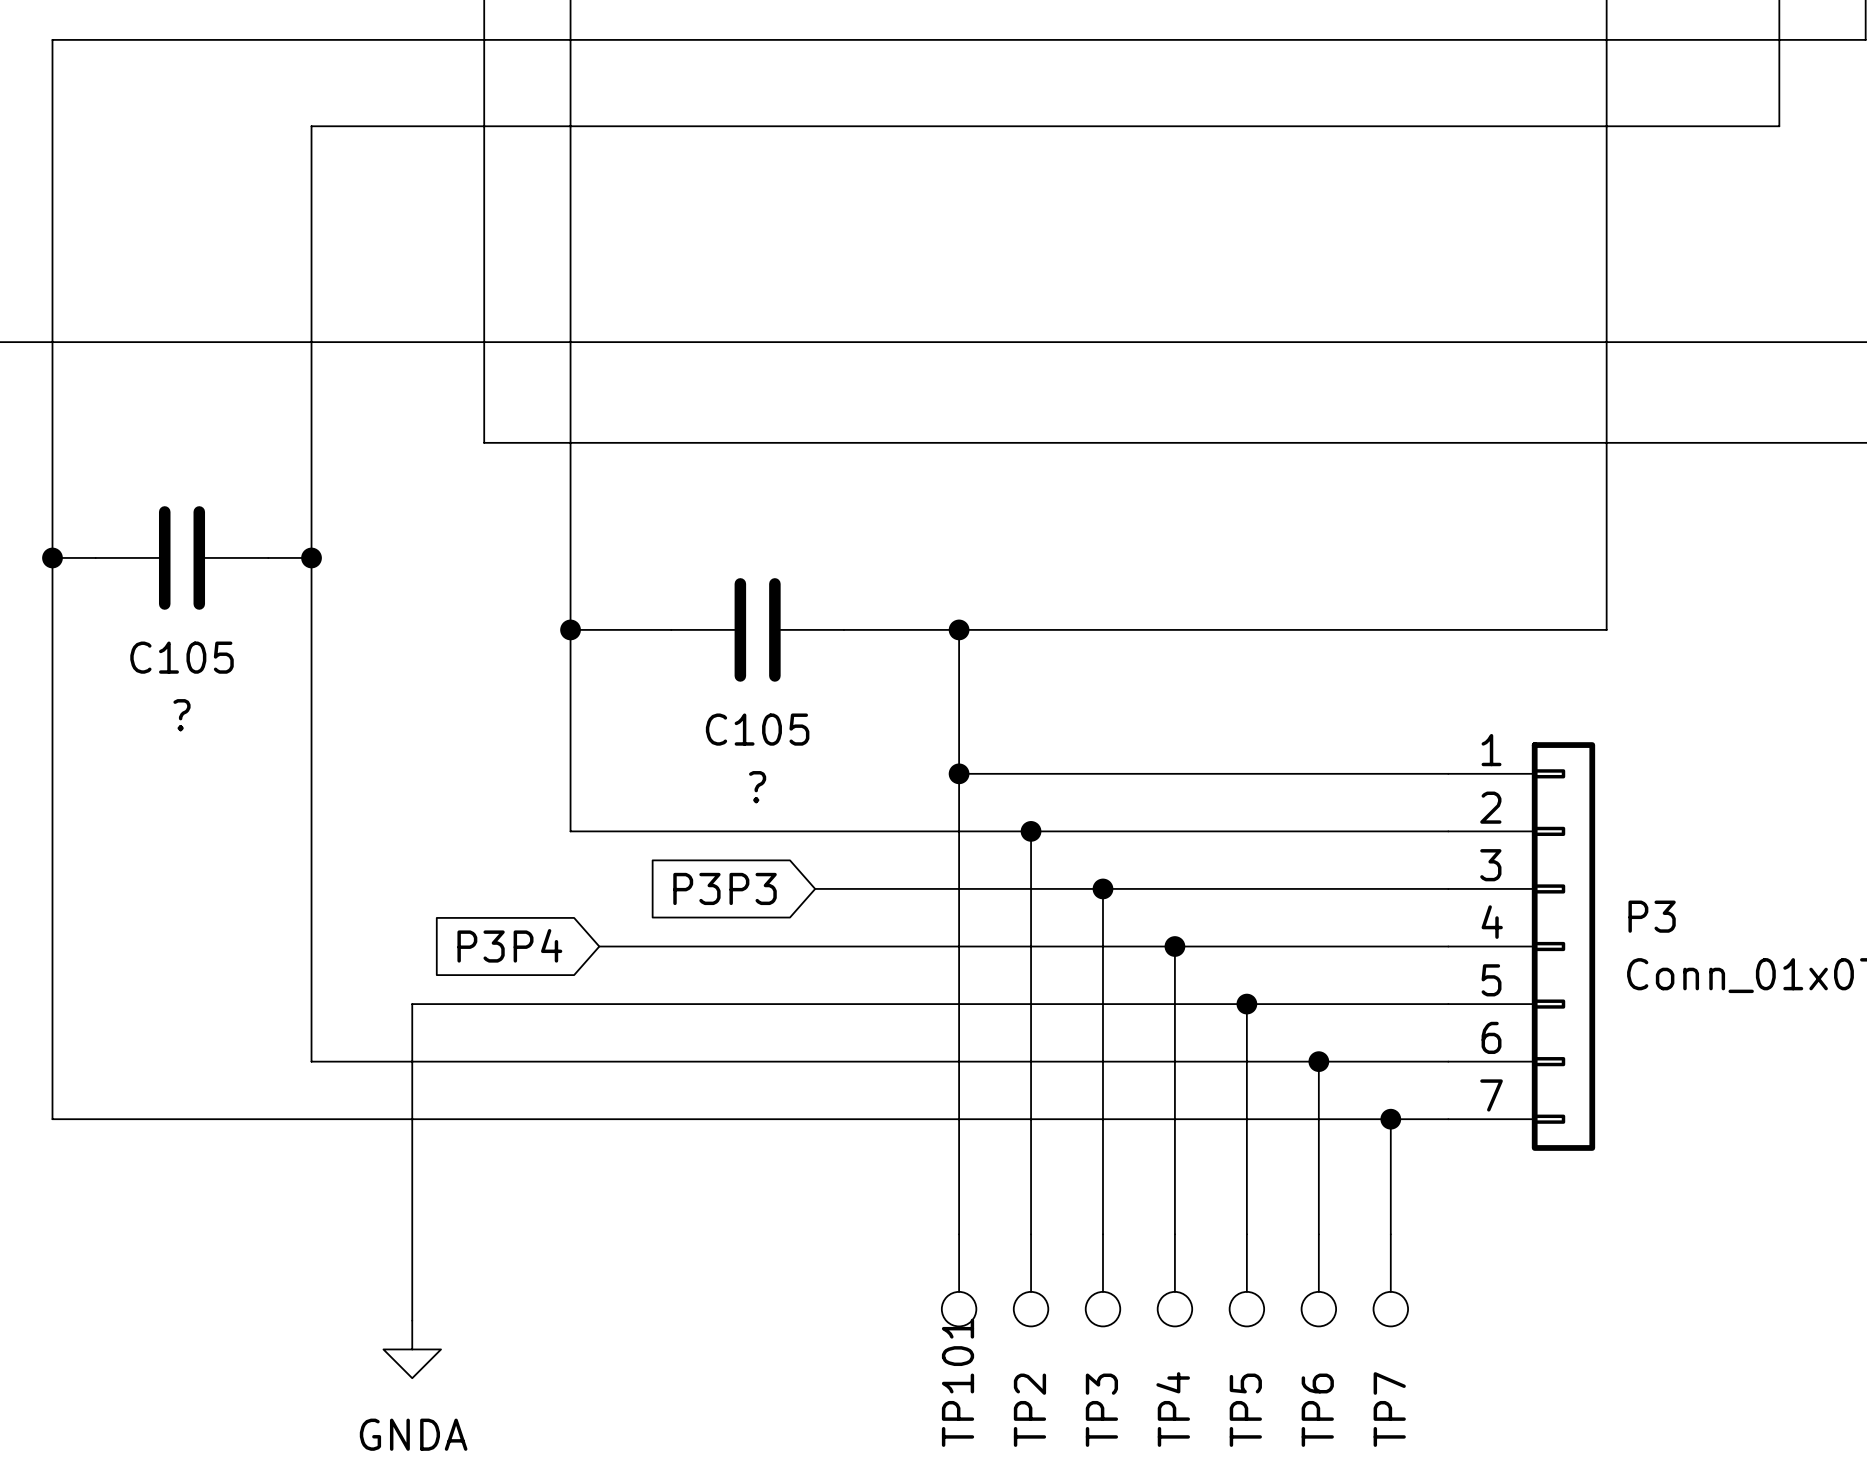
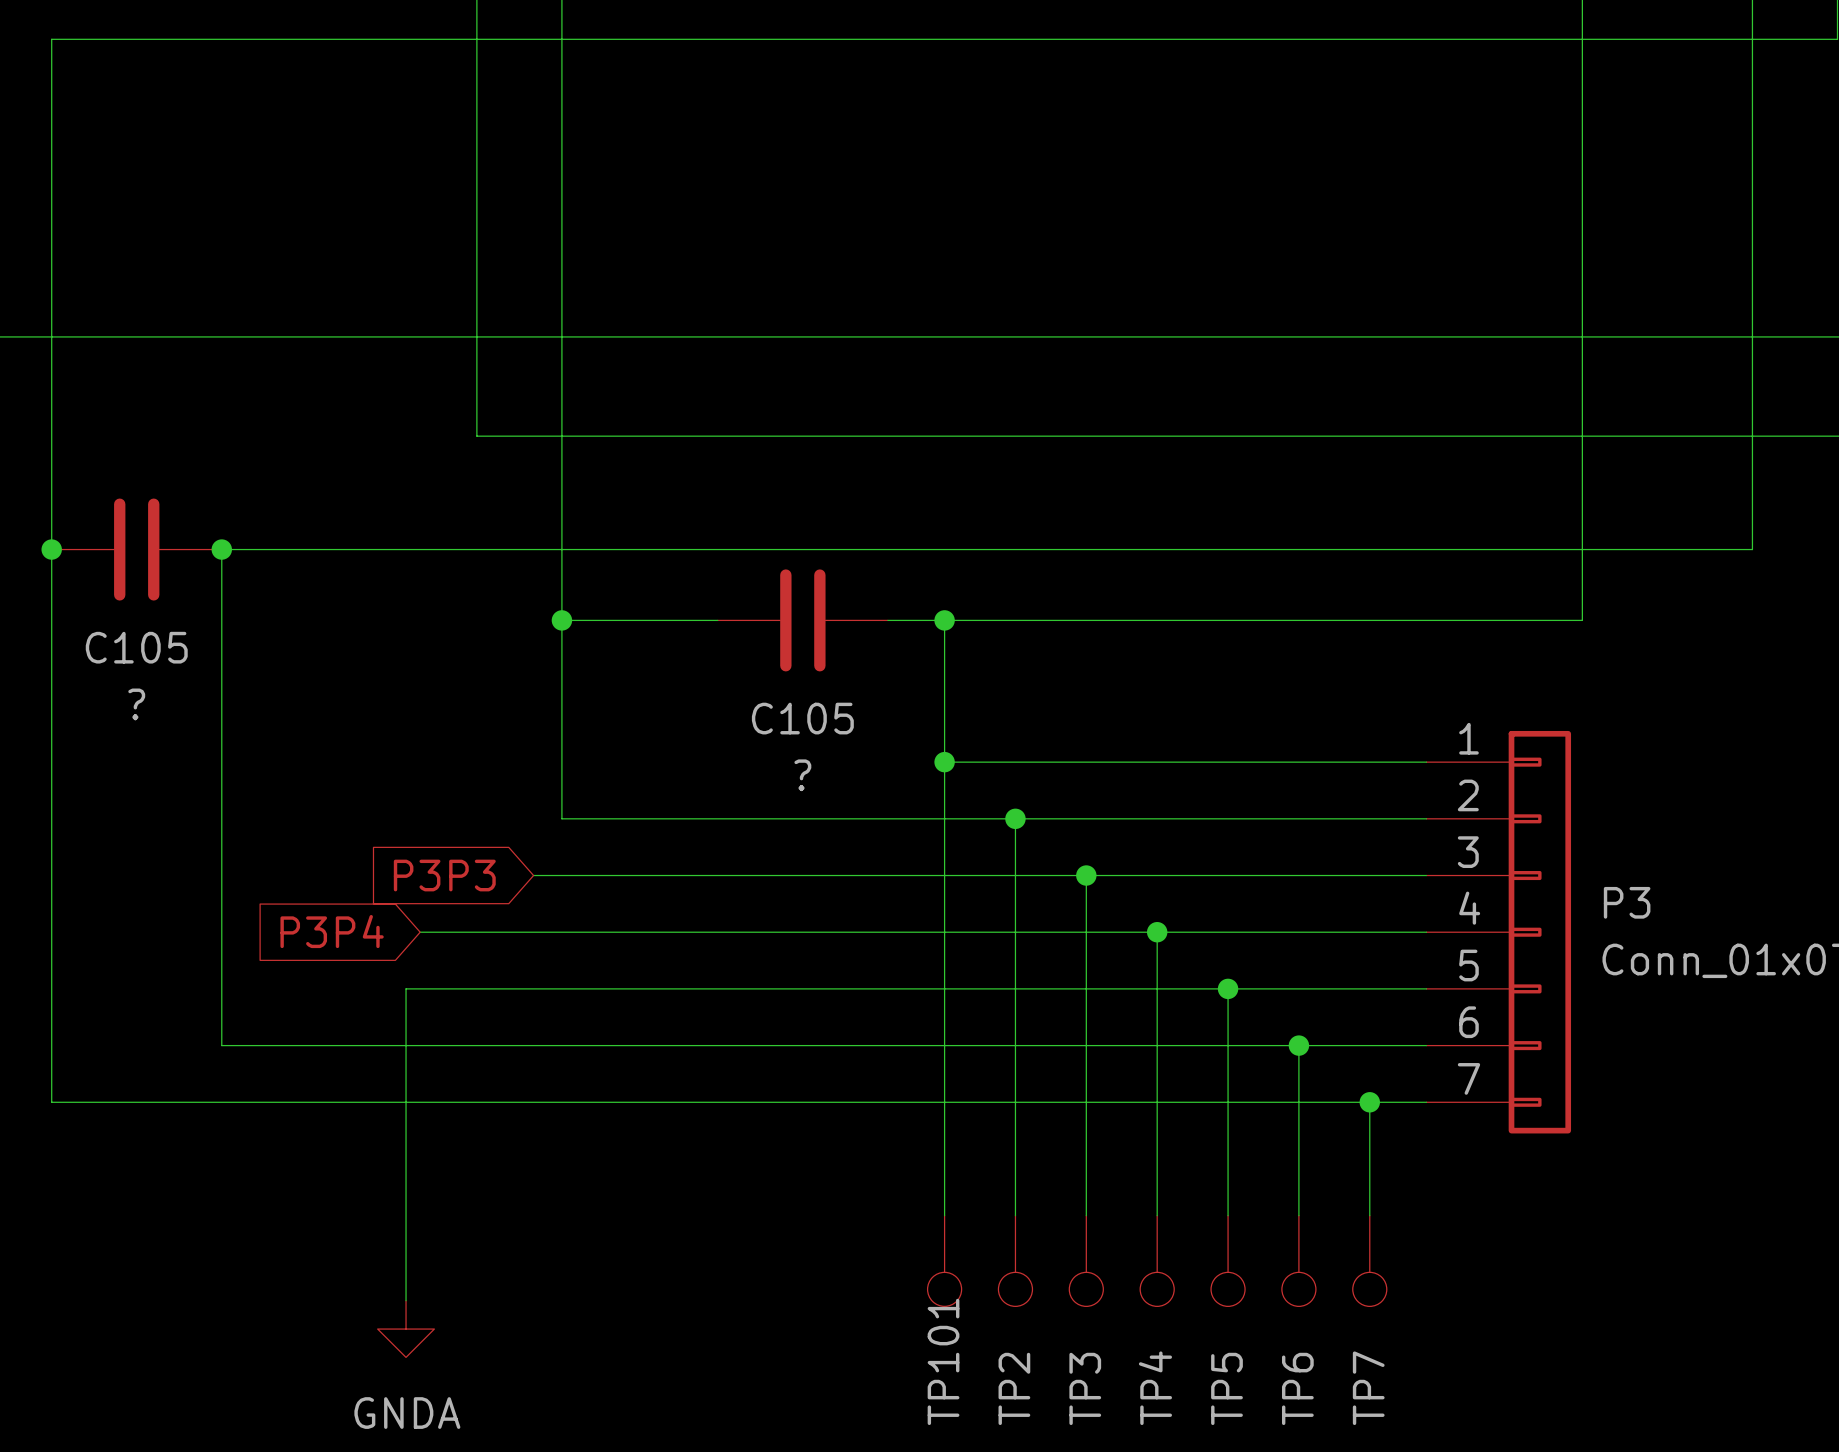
wire: (1779, 126) (311, 126) (311, 1061) -> (1752, 124) (1752, 549) (306, 549)
C105 position: (182, 557) -> (136, 549)
wire: none -> (264, 549) (221, 549) (221, 1045) (306, 1045)
junction position: (311, 557) -> (221, 549)
C105 position: (757, 629) -> (802, 620)
wire: none -> (533, 875) (802, 875)
global label position: P3P3 (725, 888) -> P3P3 (444, 875)
global label position: P3P4 (509, 945) -> P3P4 (332, 931)
wire: none -> (420, 932) (590, 932)

